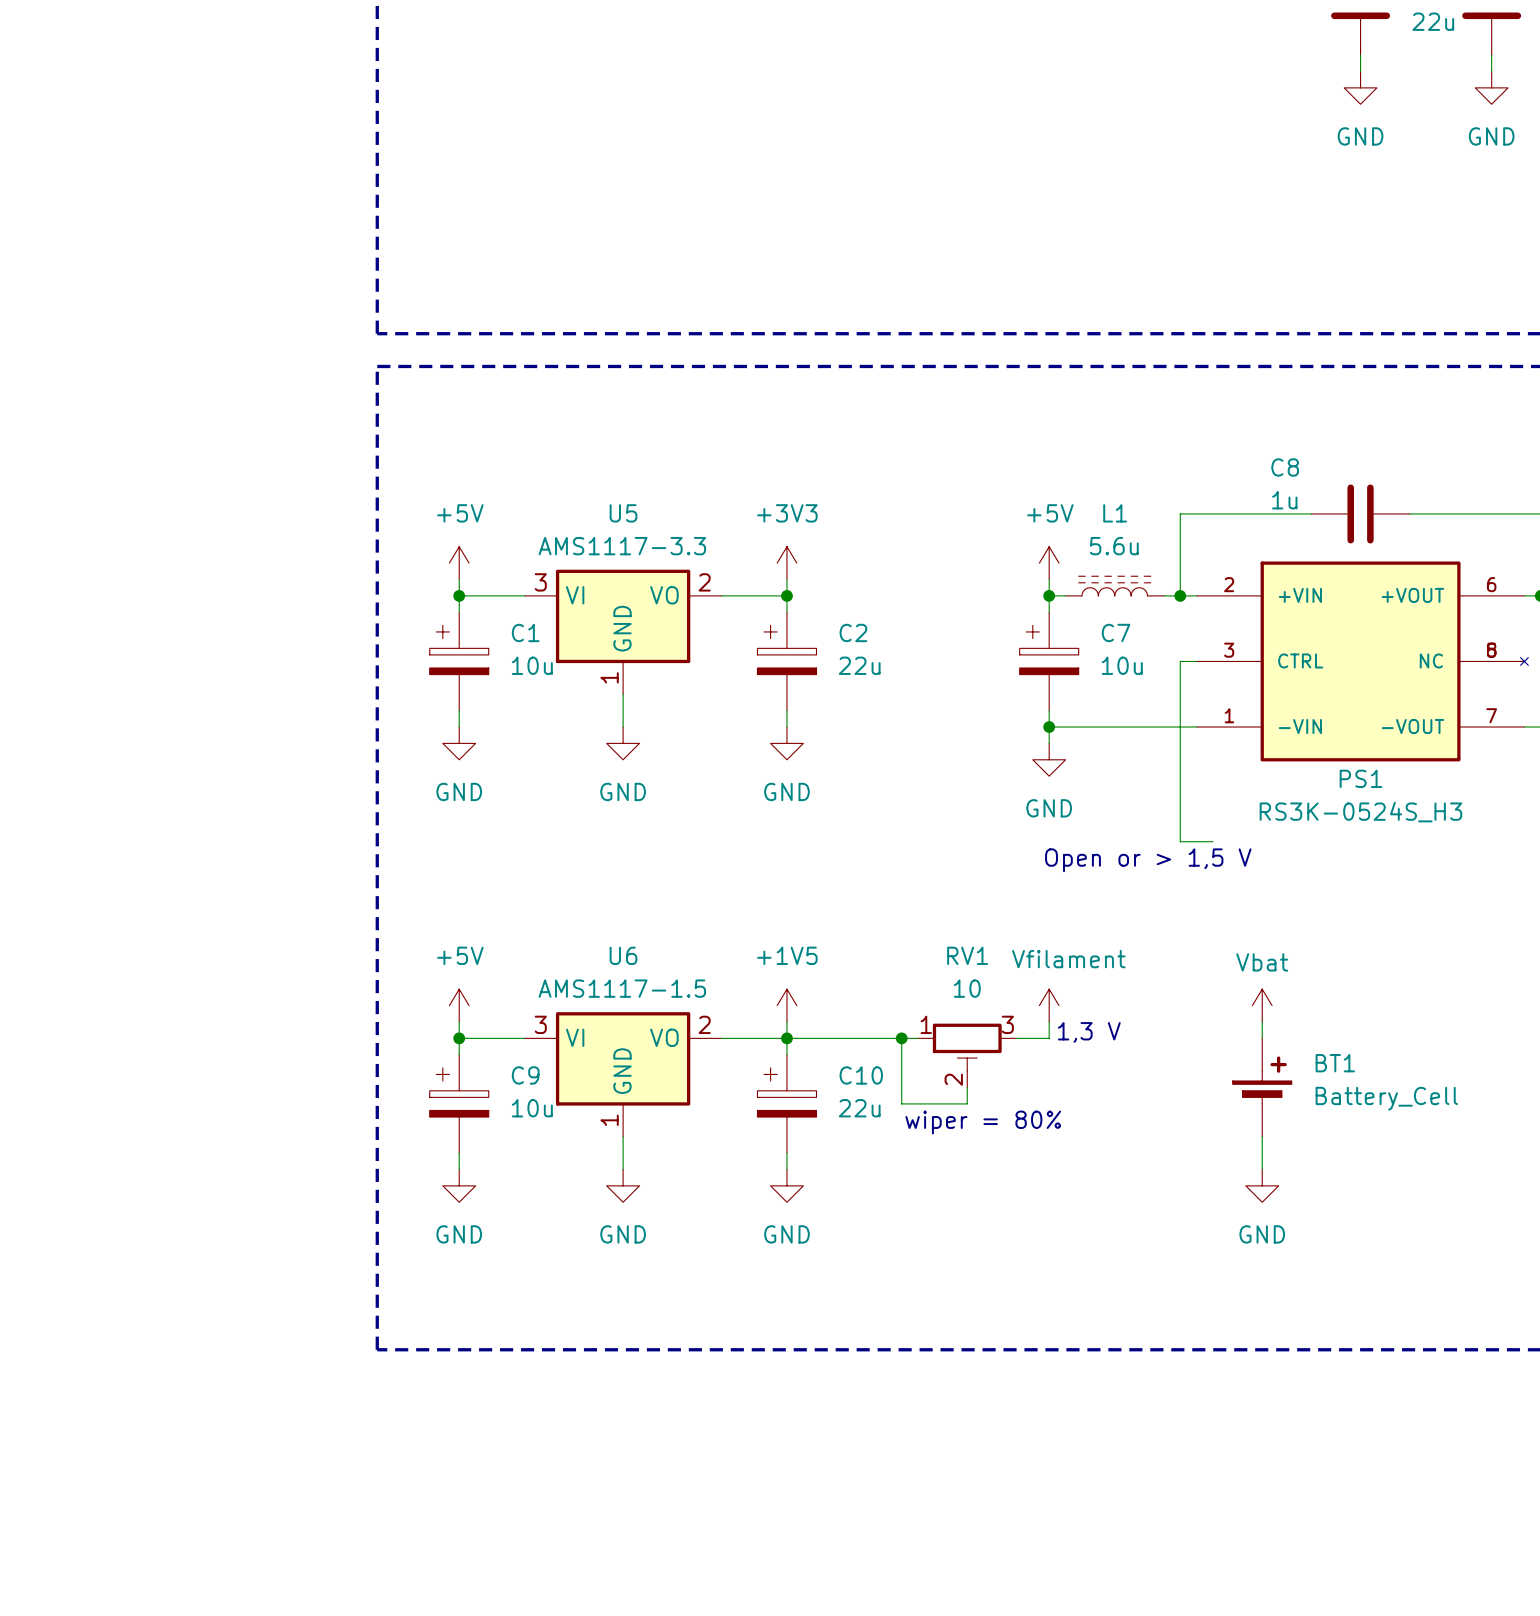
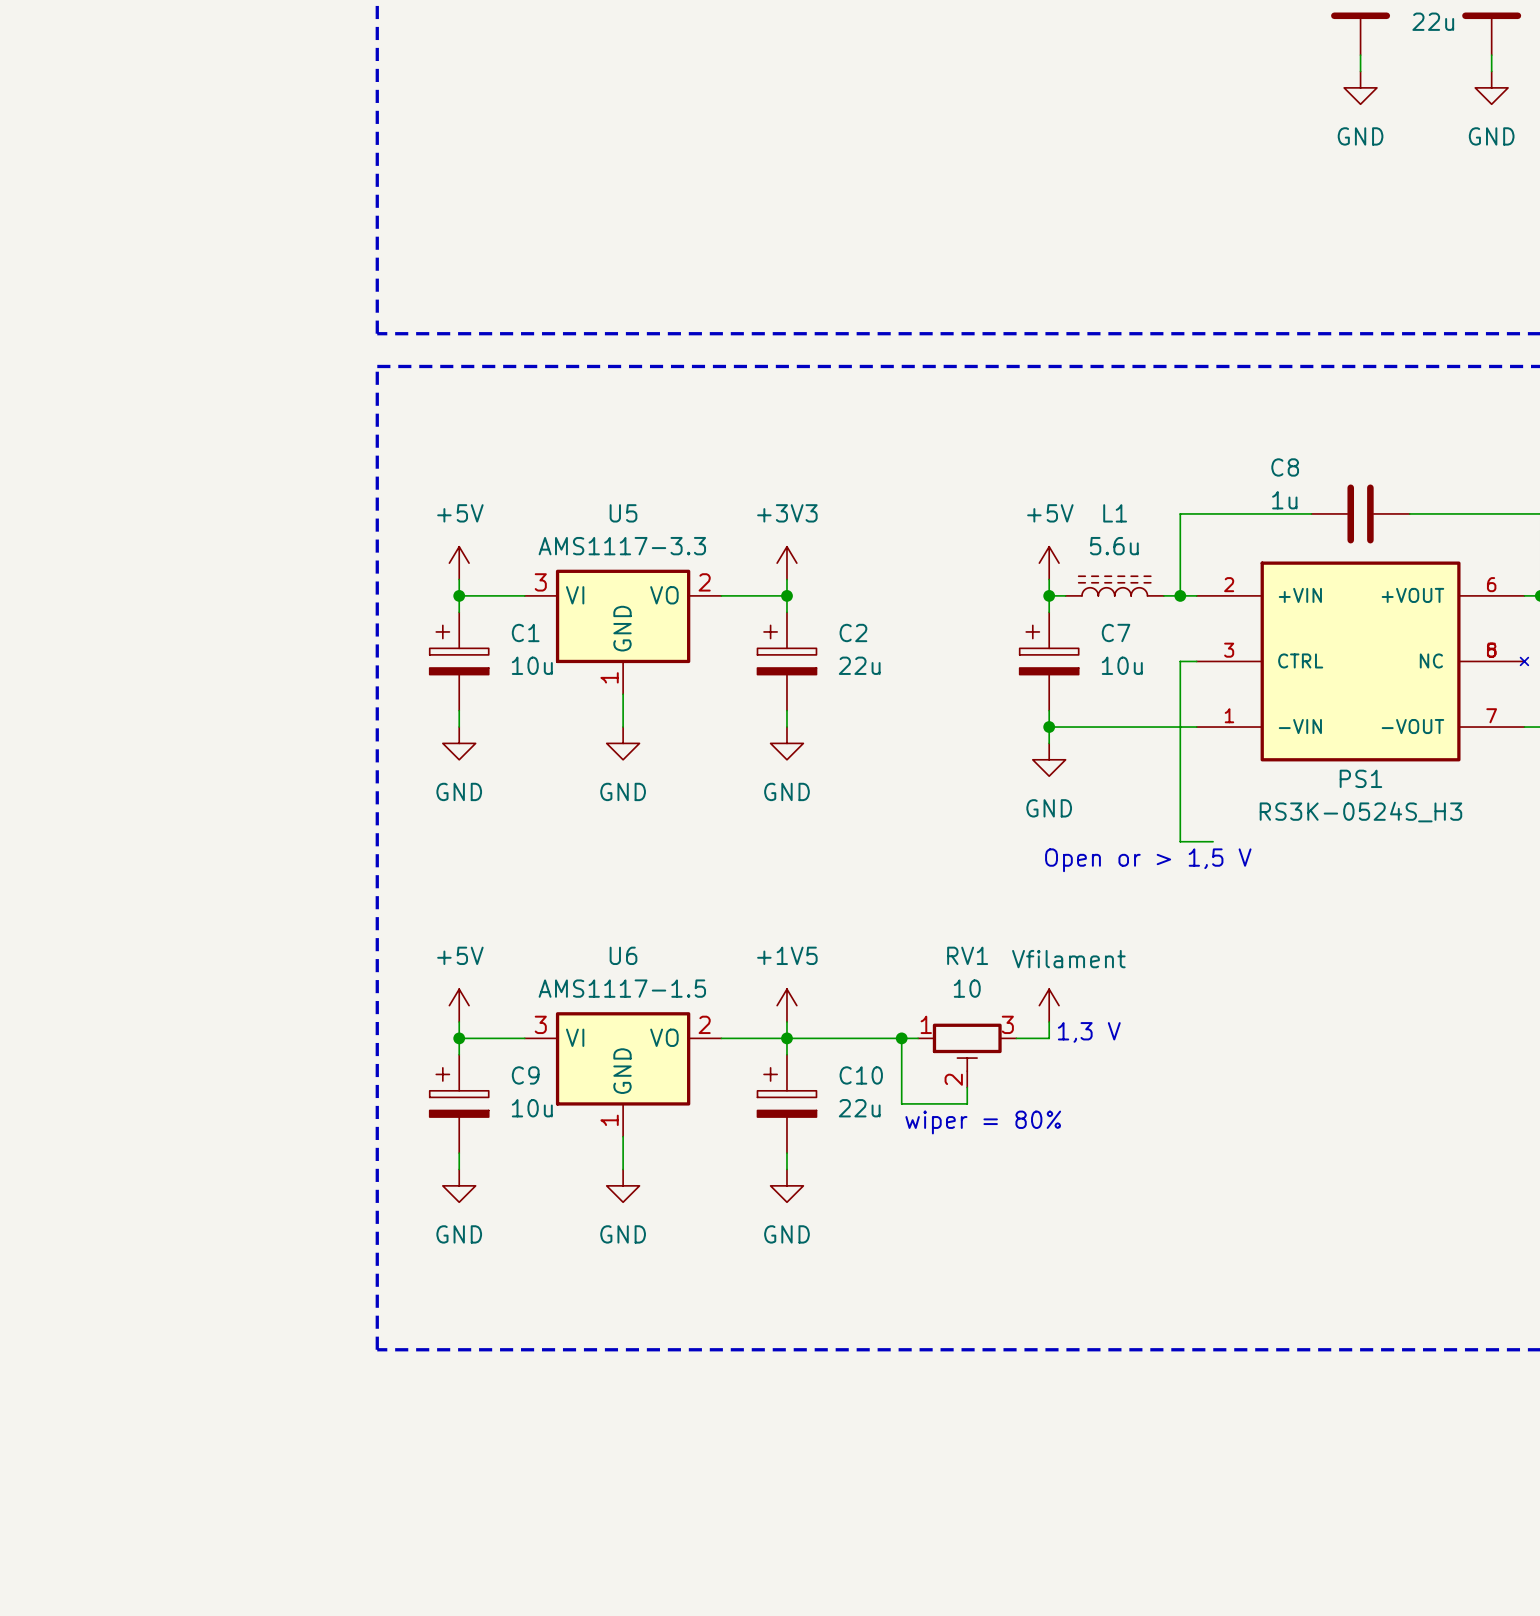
power symbol: Vbat (1262, 1005) -> none
wire: (1262, 1021) (1262, 1038) -> none
BT1: Battery_Cell (1262, 1087) -> none
wire: (1262, 1136) (1262, 1169) -> none
power symbol: GND (1262, 1185) -> none

